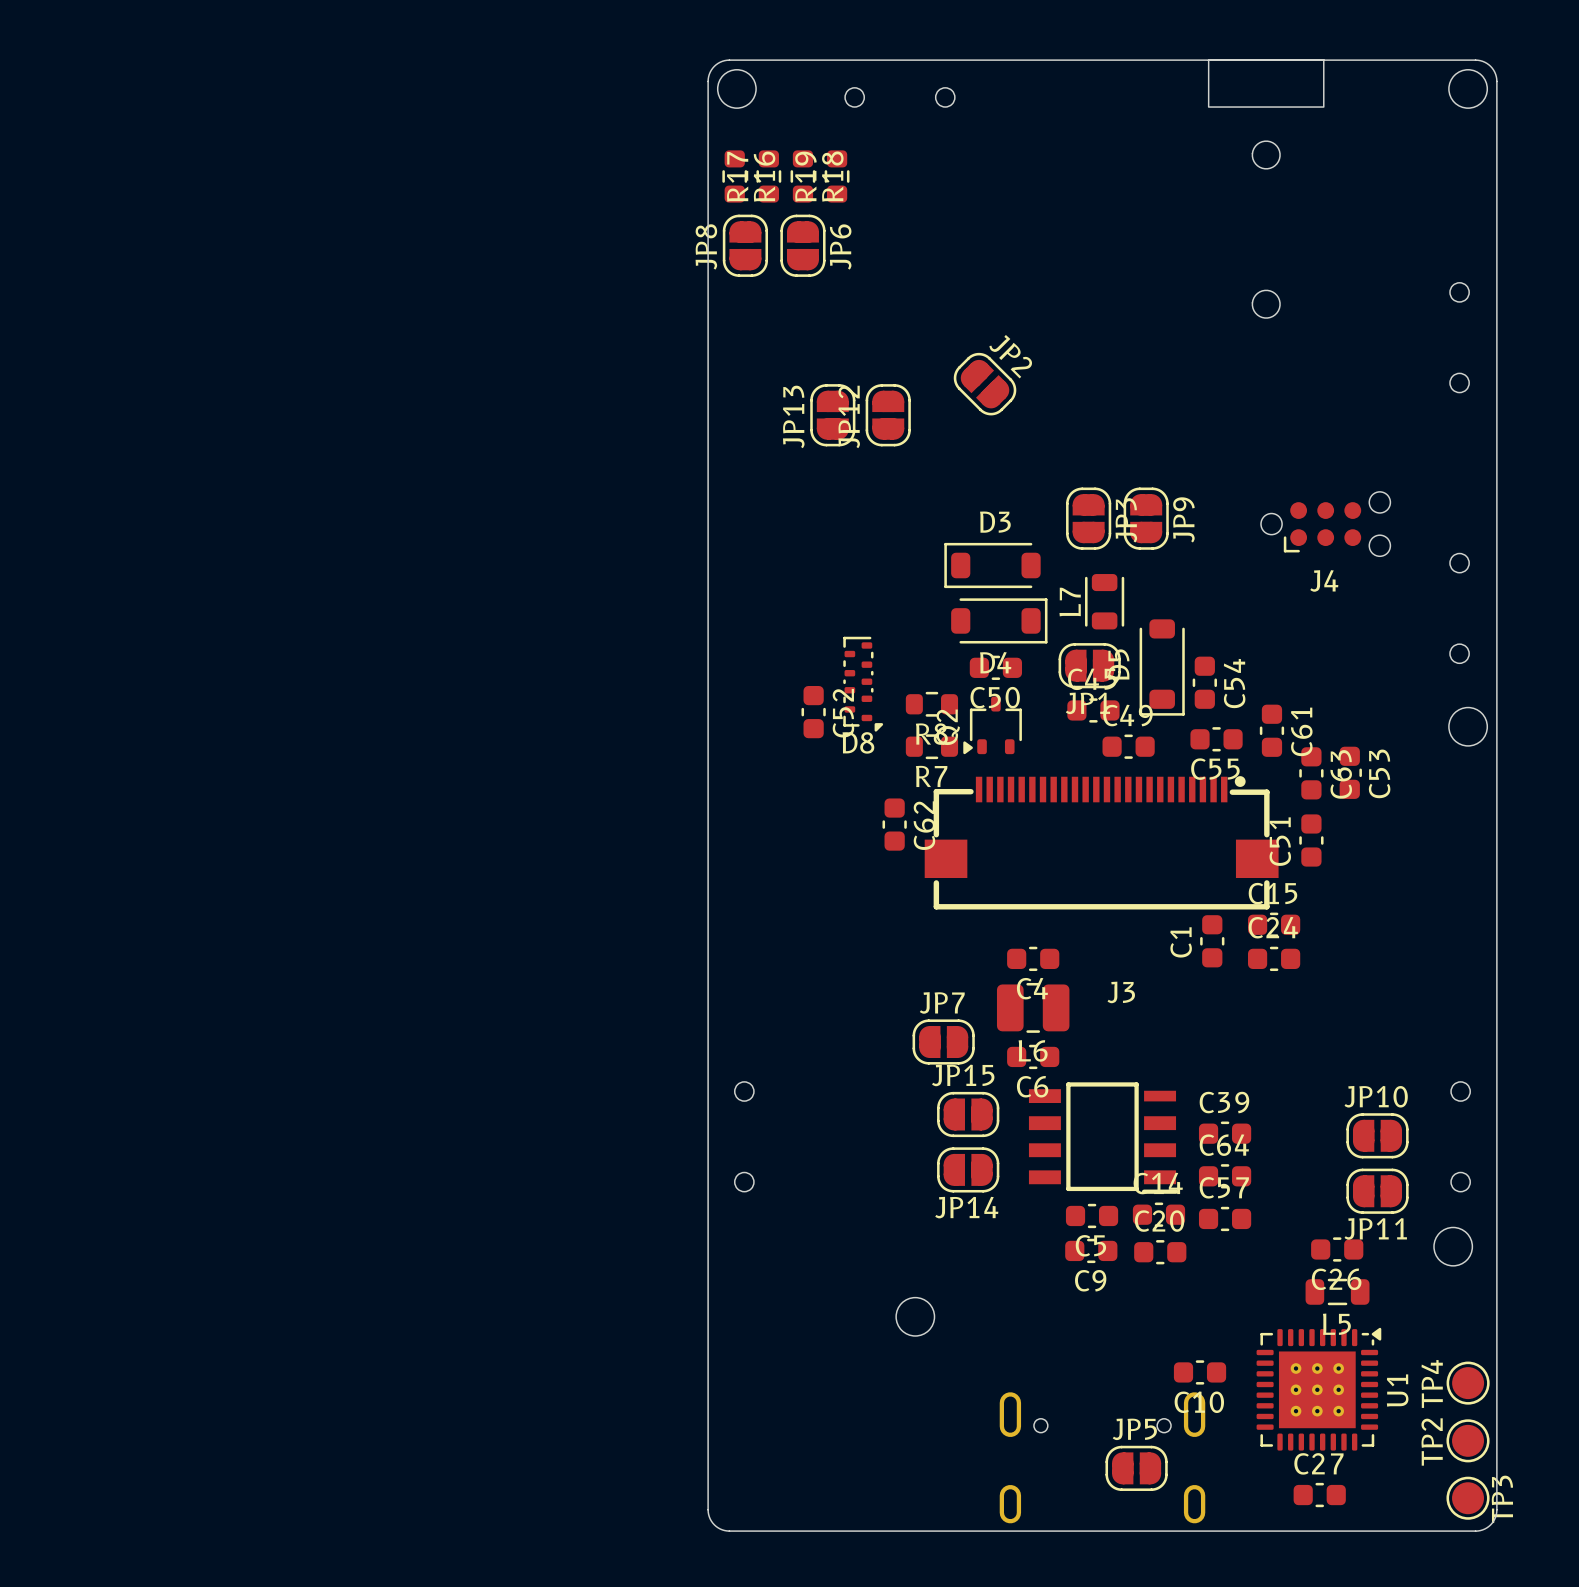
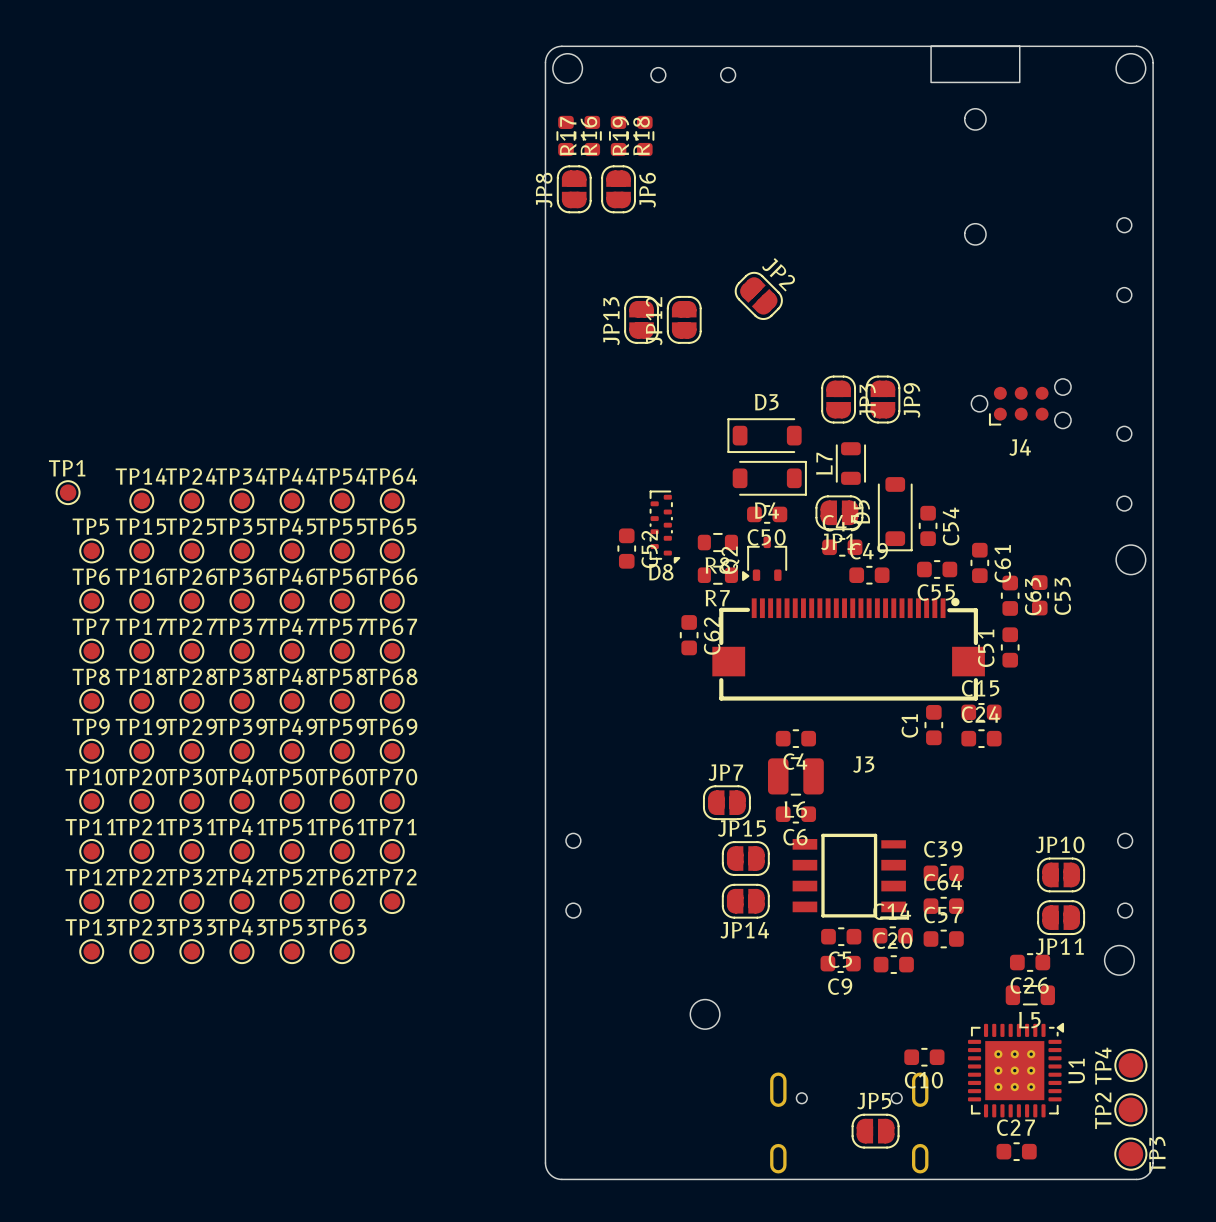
TP1: none -> (68, 492)
TP14: none -> (141, 500)
TP24: none -> (191, 500)
TP34: none -> (241, 500)
TP44: none -> (292, 500)
TP54: none -> (342, 500)
TP64: none -> (392, 500)
TP5: none -> (91, 550)
TP15: none -> (141, 550)
TP25: none -> (191, 550)
TP35: none -> (241, 550)
TP45: none -> (292, 550)
TP55: none -> (342, 550)
TP65: none -> (392, 550)
TP6: none -> (91, 601)
TP16: none -> (141, 601)
TP26: none -> (191, 601)
TP36: none -> (241, 601)
TP46: none -> (292, 601)
TP56: none -> (342, 601)
TP66: none -> (392, 601)
TP7: none -> (91, 651)
TP17: none -> (141, 651)
TP27: none -> (191, 651)
TP37: none -> (241, 651)
TP47: none -> (292, 651)
TP57: none -> (342, 651)
TP67: none -> (392, 651)
TP8: none -> (91, 701)
TP18: none -> (141, 701)
TP28: none -> (191, 701)
TP38: none -> (241, 701)
TP48: none -> (292, 701)
TP58: none -> (342, 701)
TP68: none -> (392, 701)
TP9: none -> (91, 751)
TP19: none -> (141, 751)
TP29: none -> (191, 751)
TP39: none -> (241, 751)
TP49: none -> (292, 751)
TP59: none -> (342, 751)
TP69: none -> (392, 751)
TP10: none -> (91, 801)
TP20: none -> (141, 801)
TP30: none -> (191, 801)
TP40: none -> (241, 801)
TP50: none -> (292, 801)
TP60: none -> (342, 801)
TP70: none -> (392, 801)
TP11: none -> (91, 851)
TP21: none -> (141, 851)
TP31: none -> (191, 851)
TP41: none -> (241, 851)
TP51: none -> (292, 851)
TP61: none -> (342, 851)
TP71: none -> (392, 851)
TP12: none -> (91, 901)
TP22: none -> (141, 901)
TP32: none -> (191, 901)
TP42: none -> (241, 901)
TP52: none -> (292, 901)
TP62: none -> (342, 901)
TP72: none -> (392, 901)
TP13: none -> (91, 951)
TP23: none -> (141, 951)
TP33: none -> (191, 951)
TP43: none -> (241, 951)
TP53: none -> (292, 951)
TP63: none -> (342, 951)

